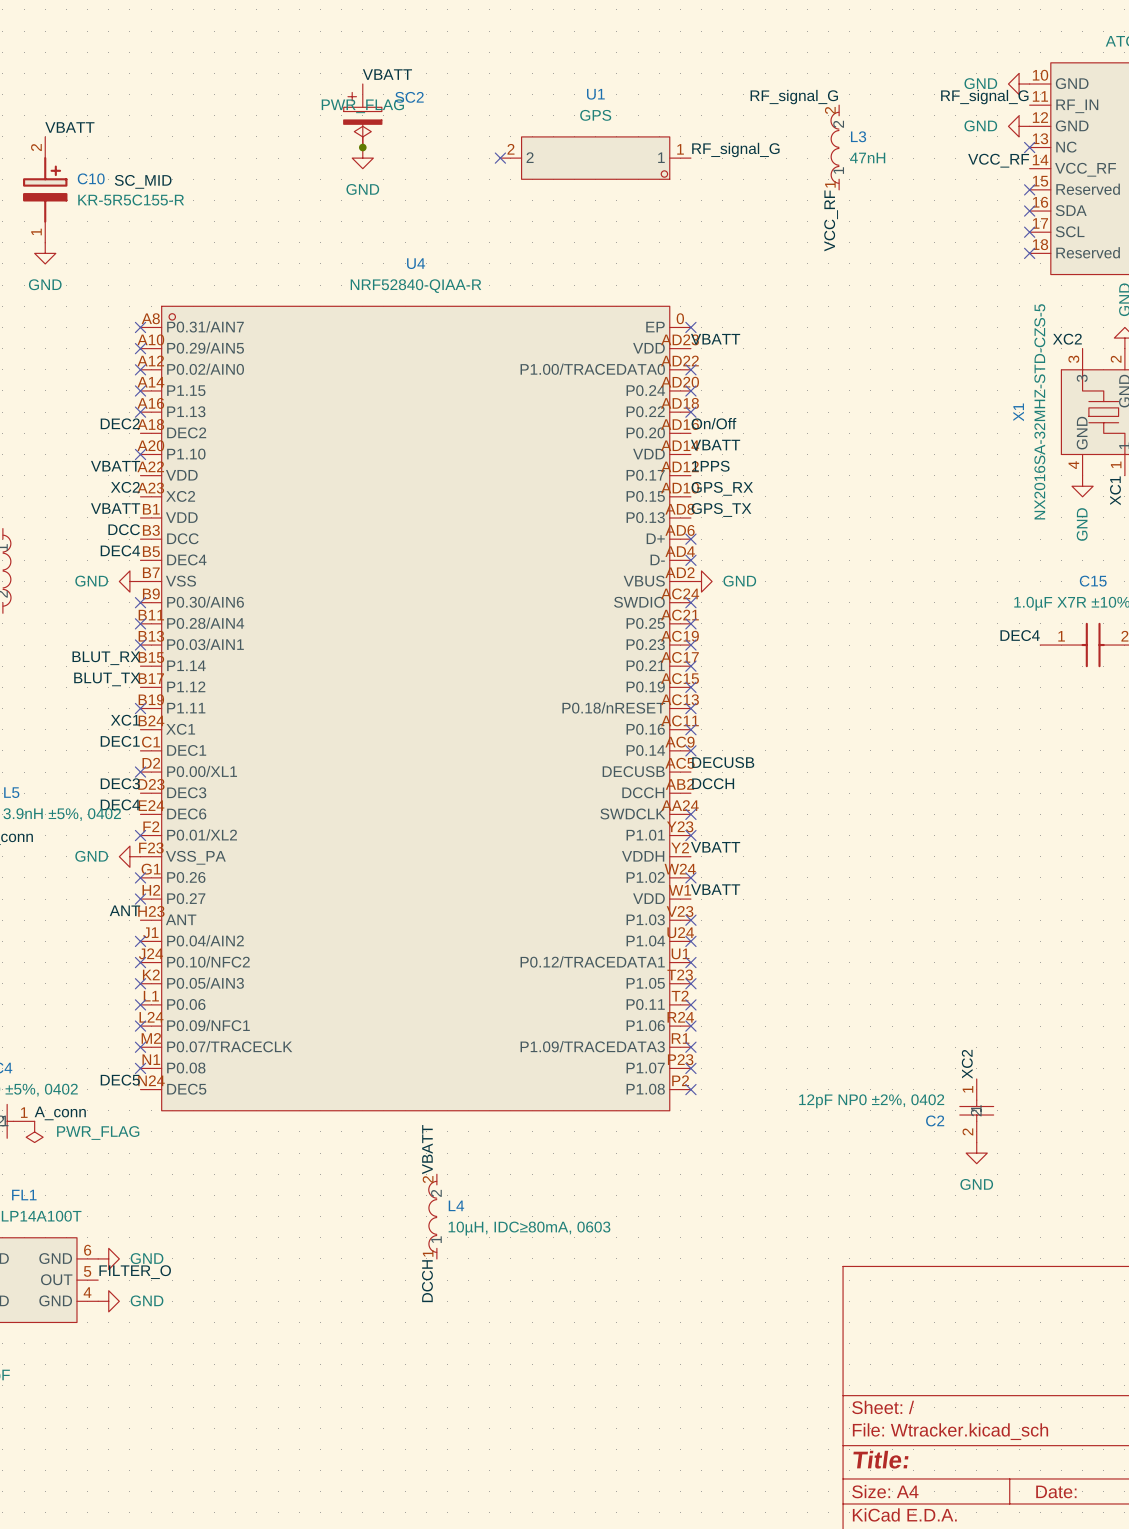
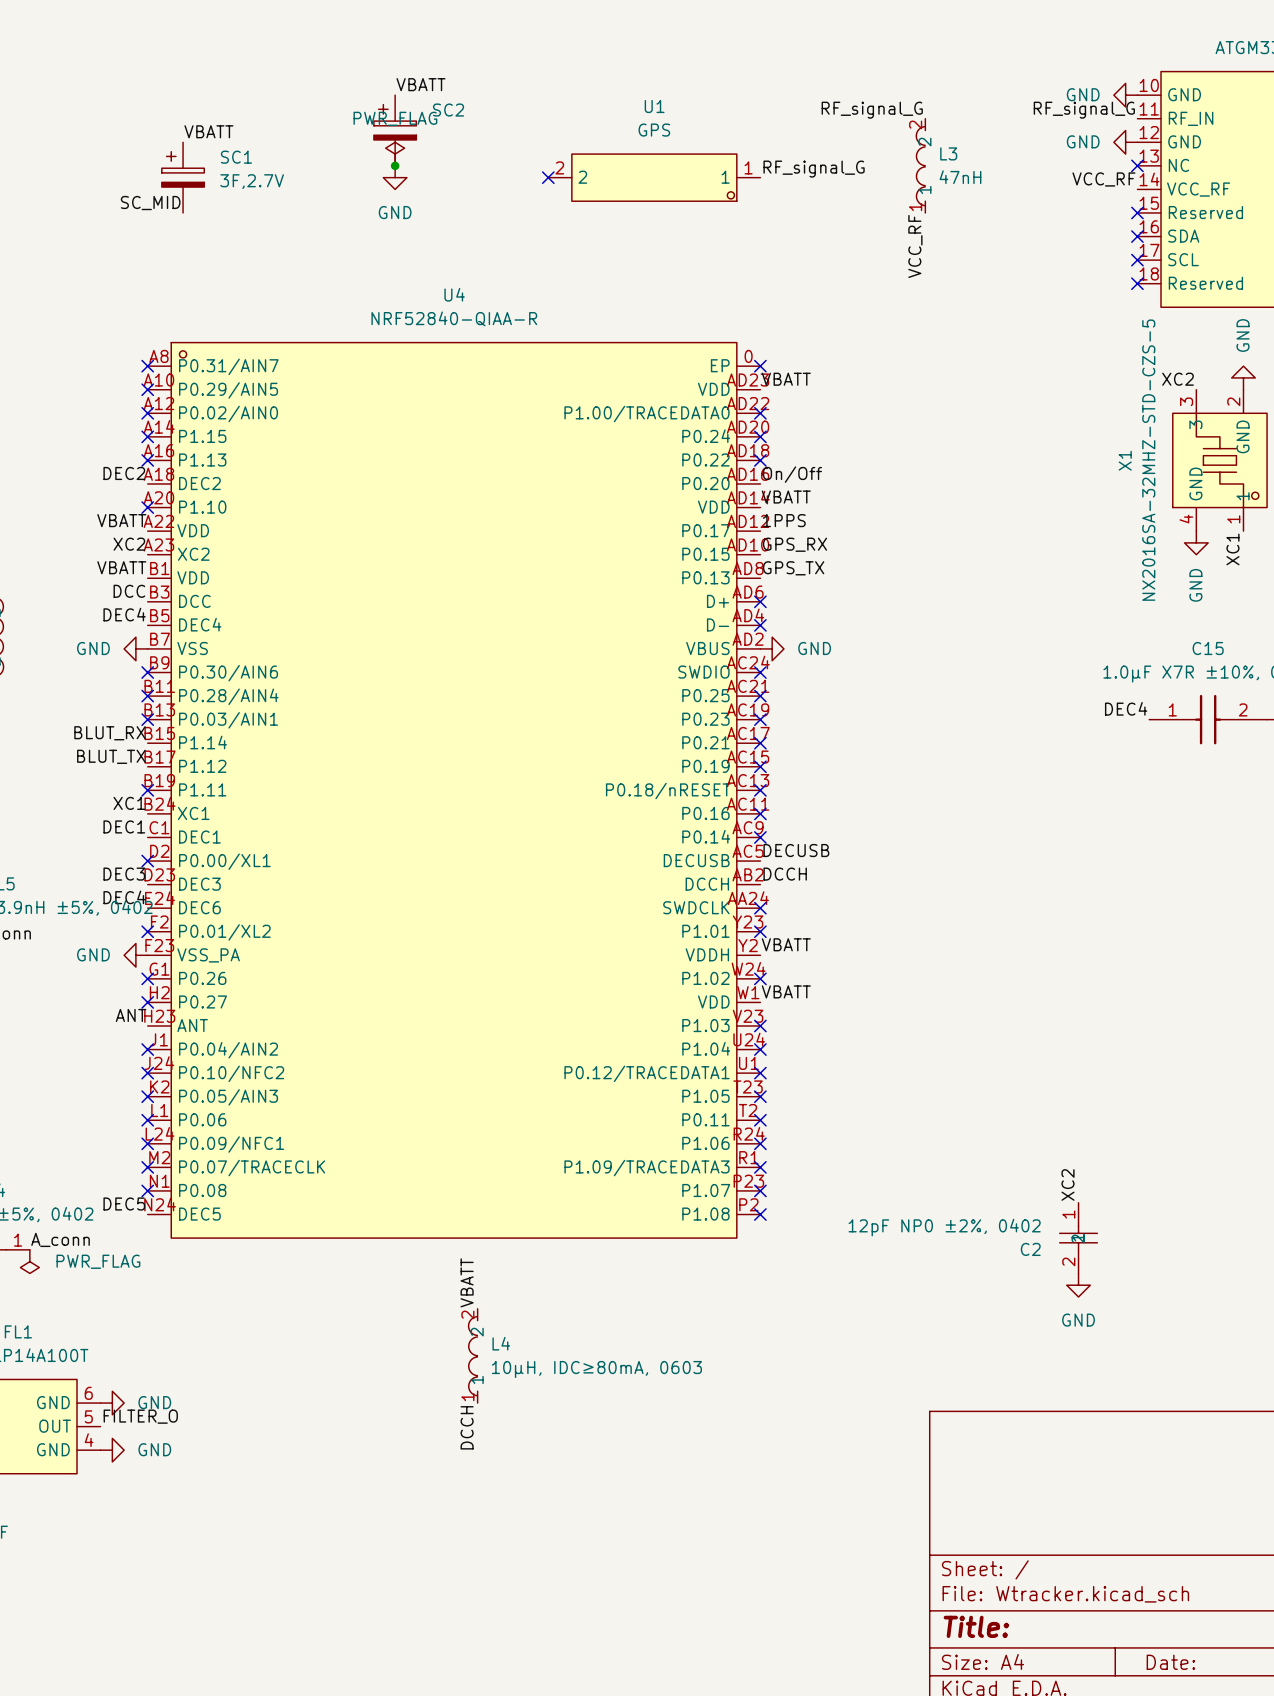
label position: VBATT (69, 127) -> VBATT (208, 131)
SC1: none -> 3F,2.7V (183, 177)
C10: KR-5R5C155-R (45, 189) -> none
power symbol: GND (45, 253) -> none

